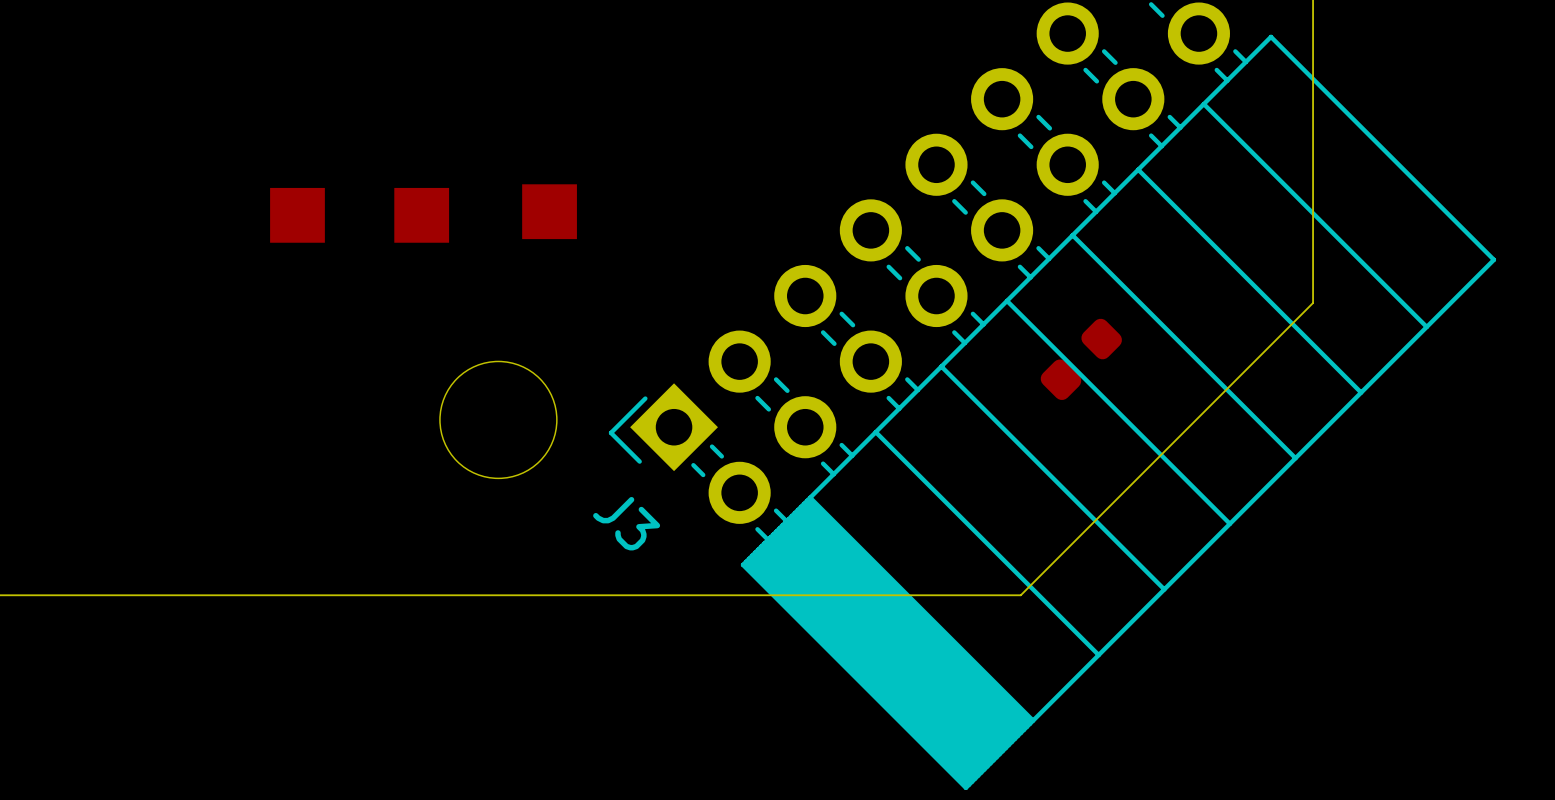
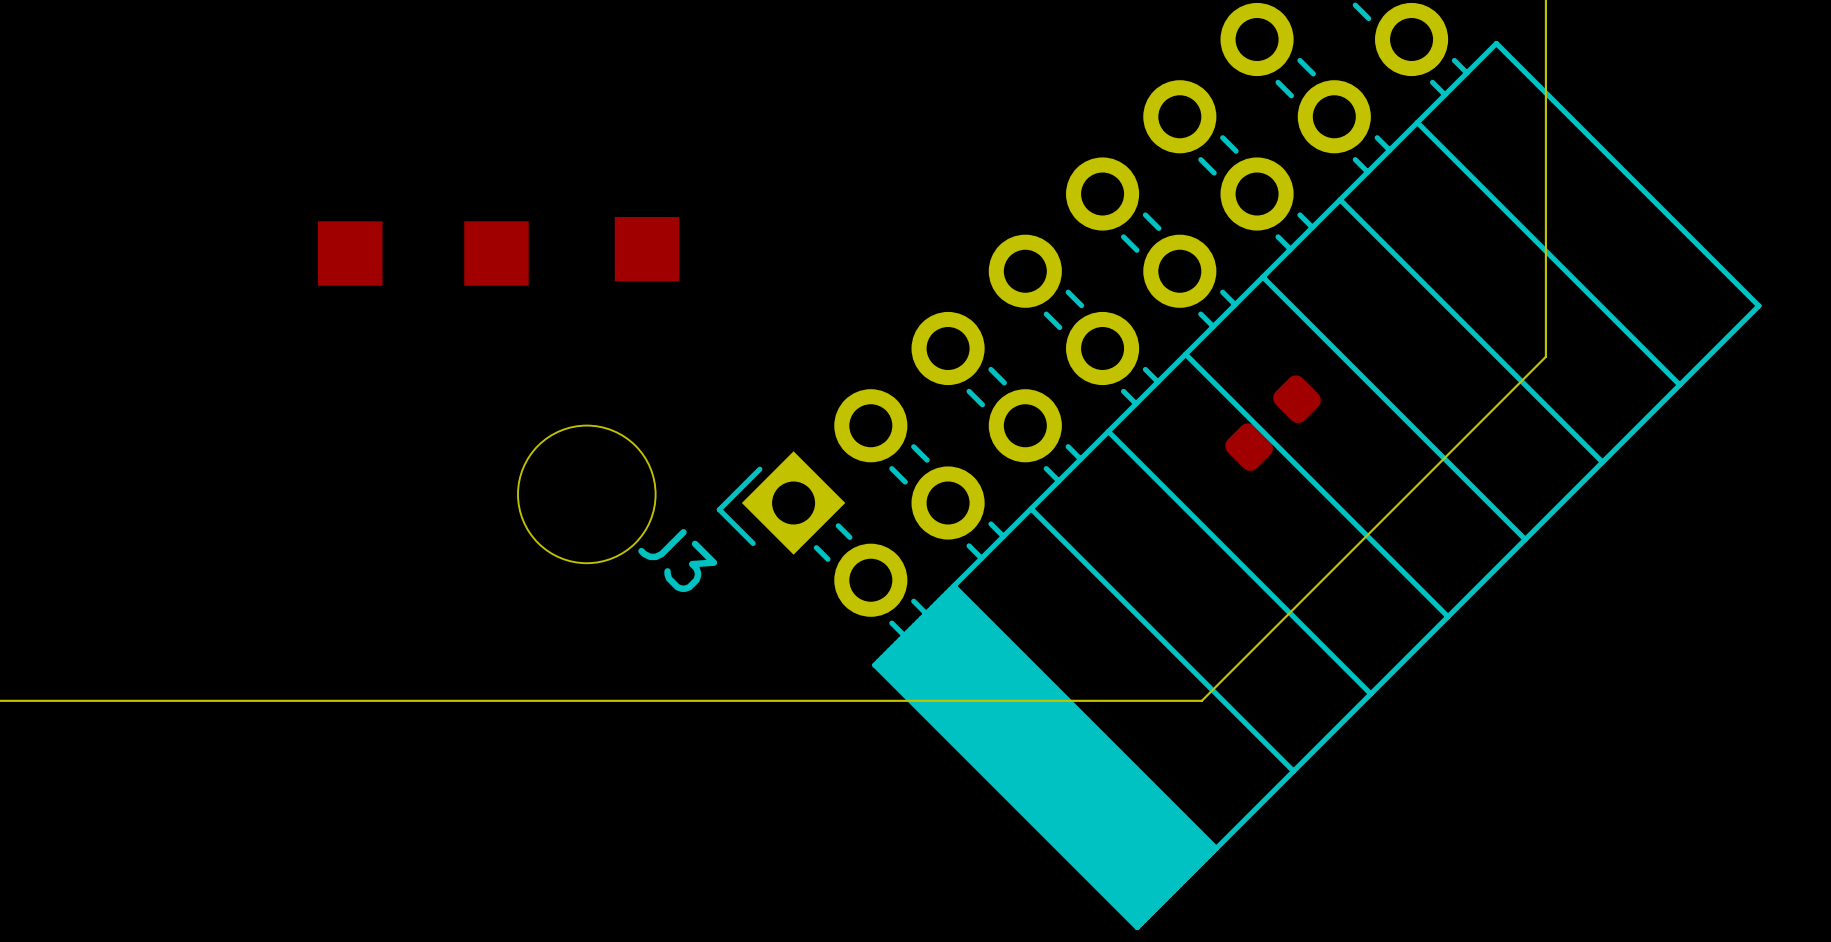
J3 name position: J3 (626, 523) -> J3 (677, 560)

